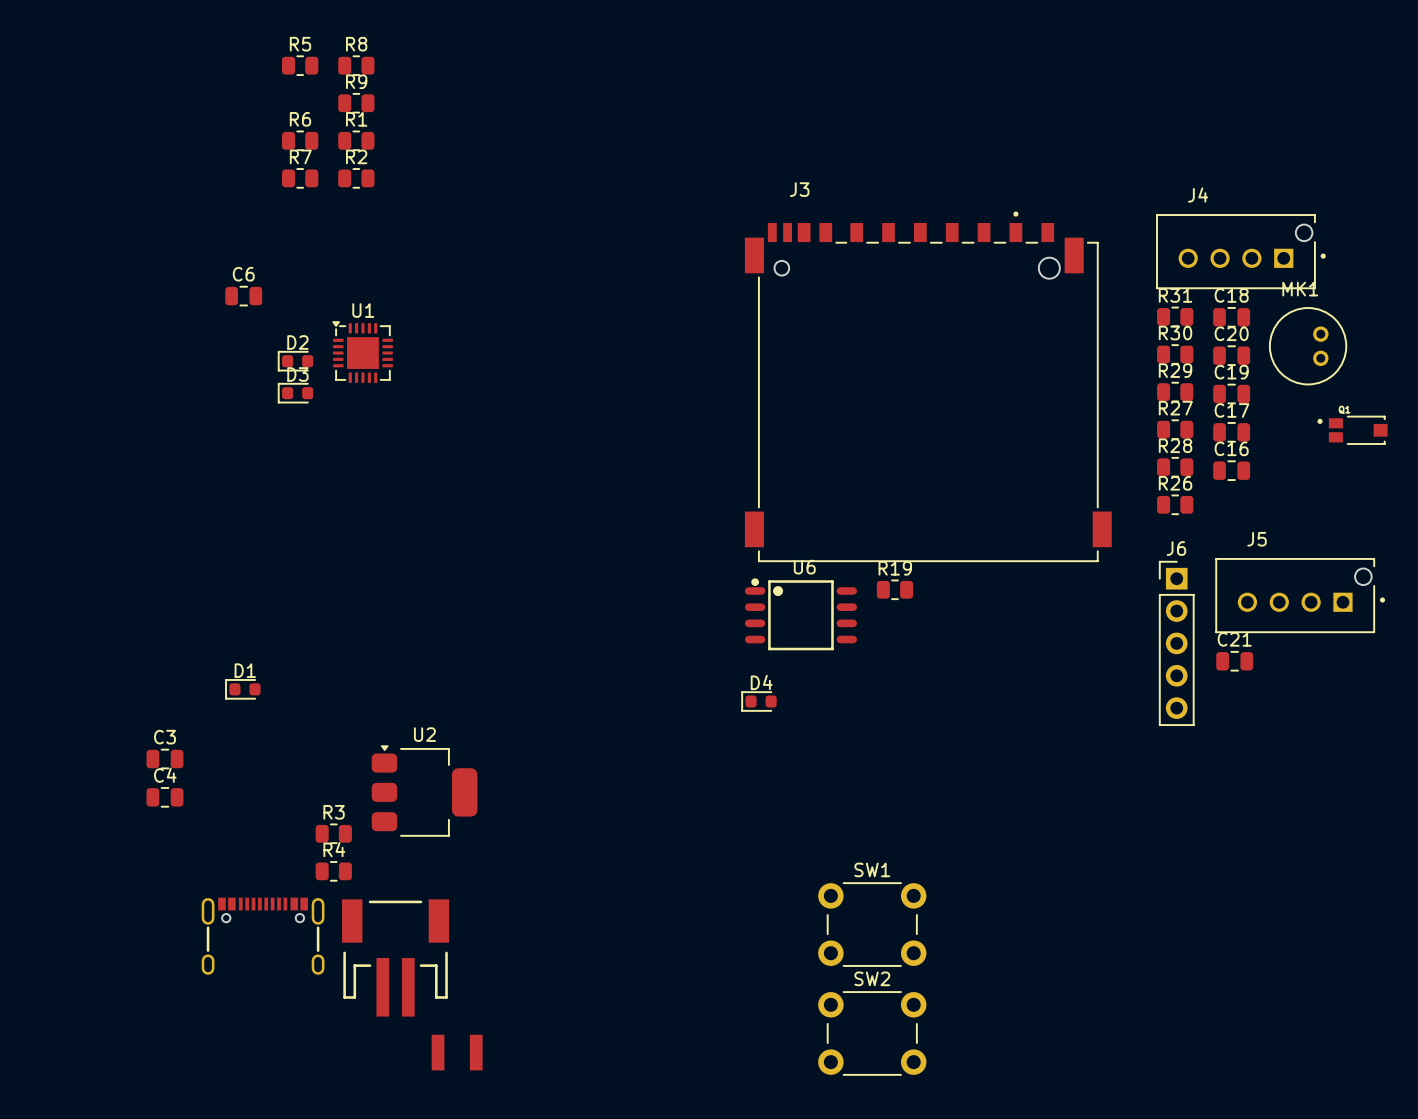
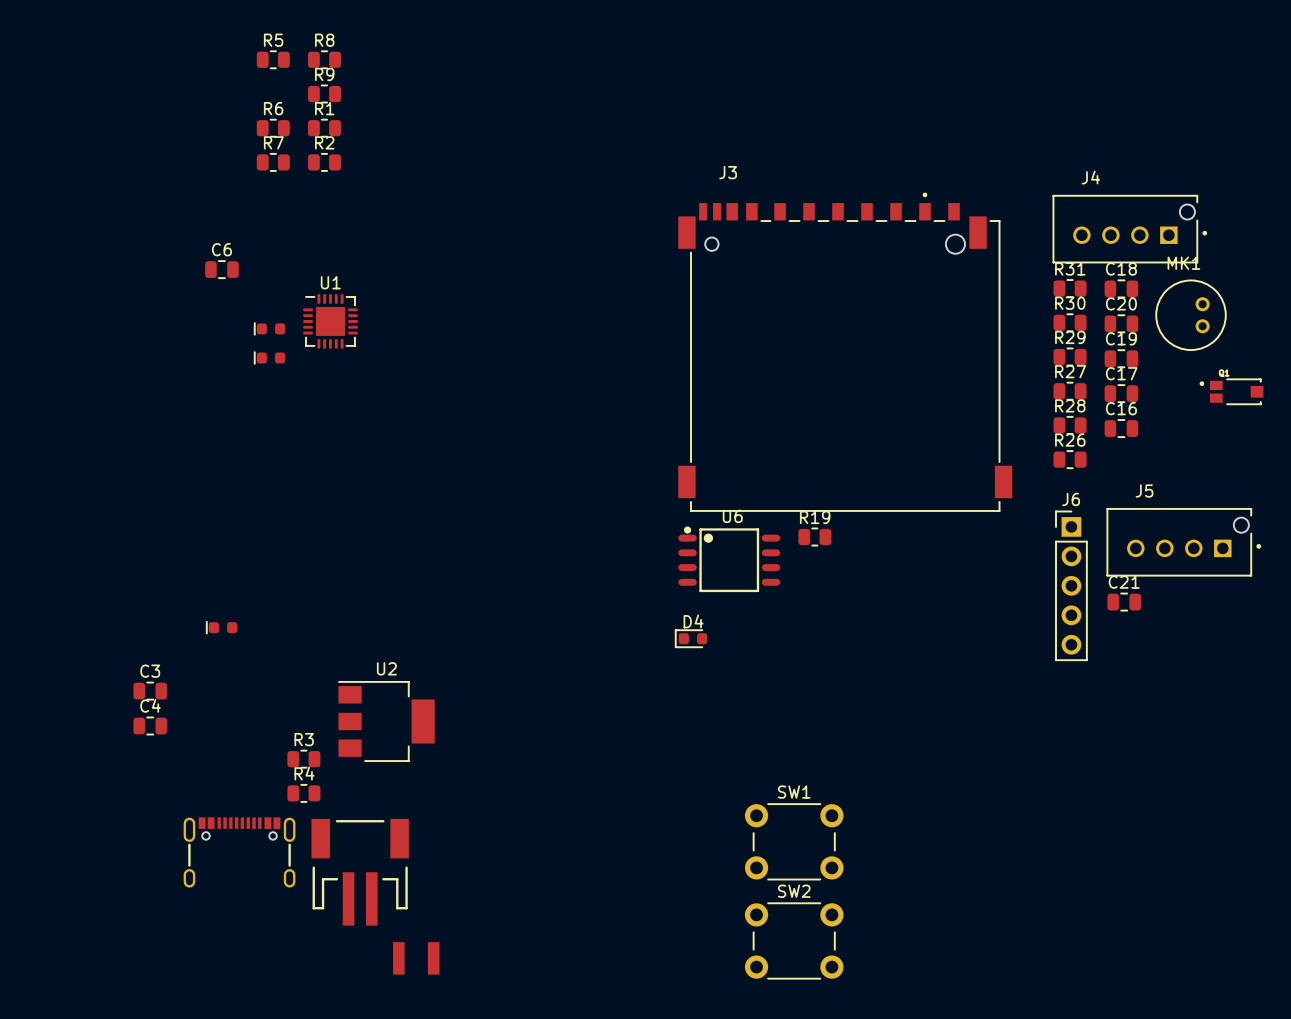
U1 footprint: [332, 321, 393, 383] -> [303, 294, 358, 349]
D2: (295, 361) -> none
part: none -> (269, 328)
D3: (295, 393) -> none
part: none -> (269, 357)
D1: (242, 689) -> none
part: none -> (221, 627)
U2 footprint: [371, 745, 478, 837] -> [338, 681, 435, 762]

